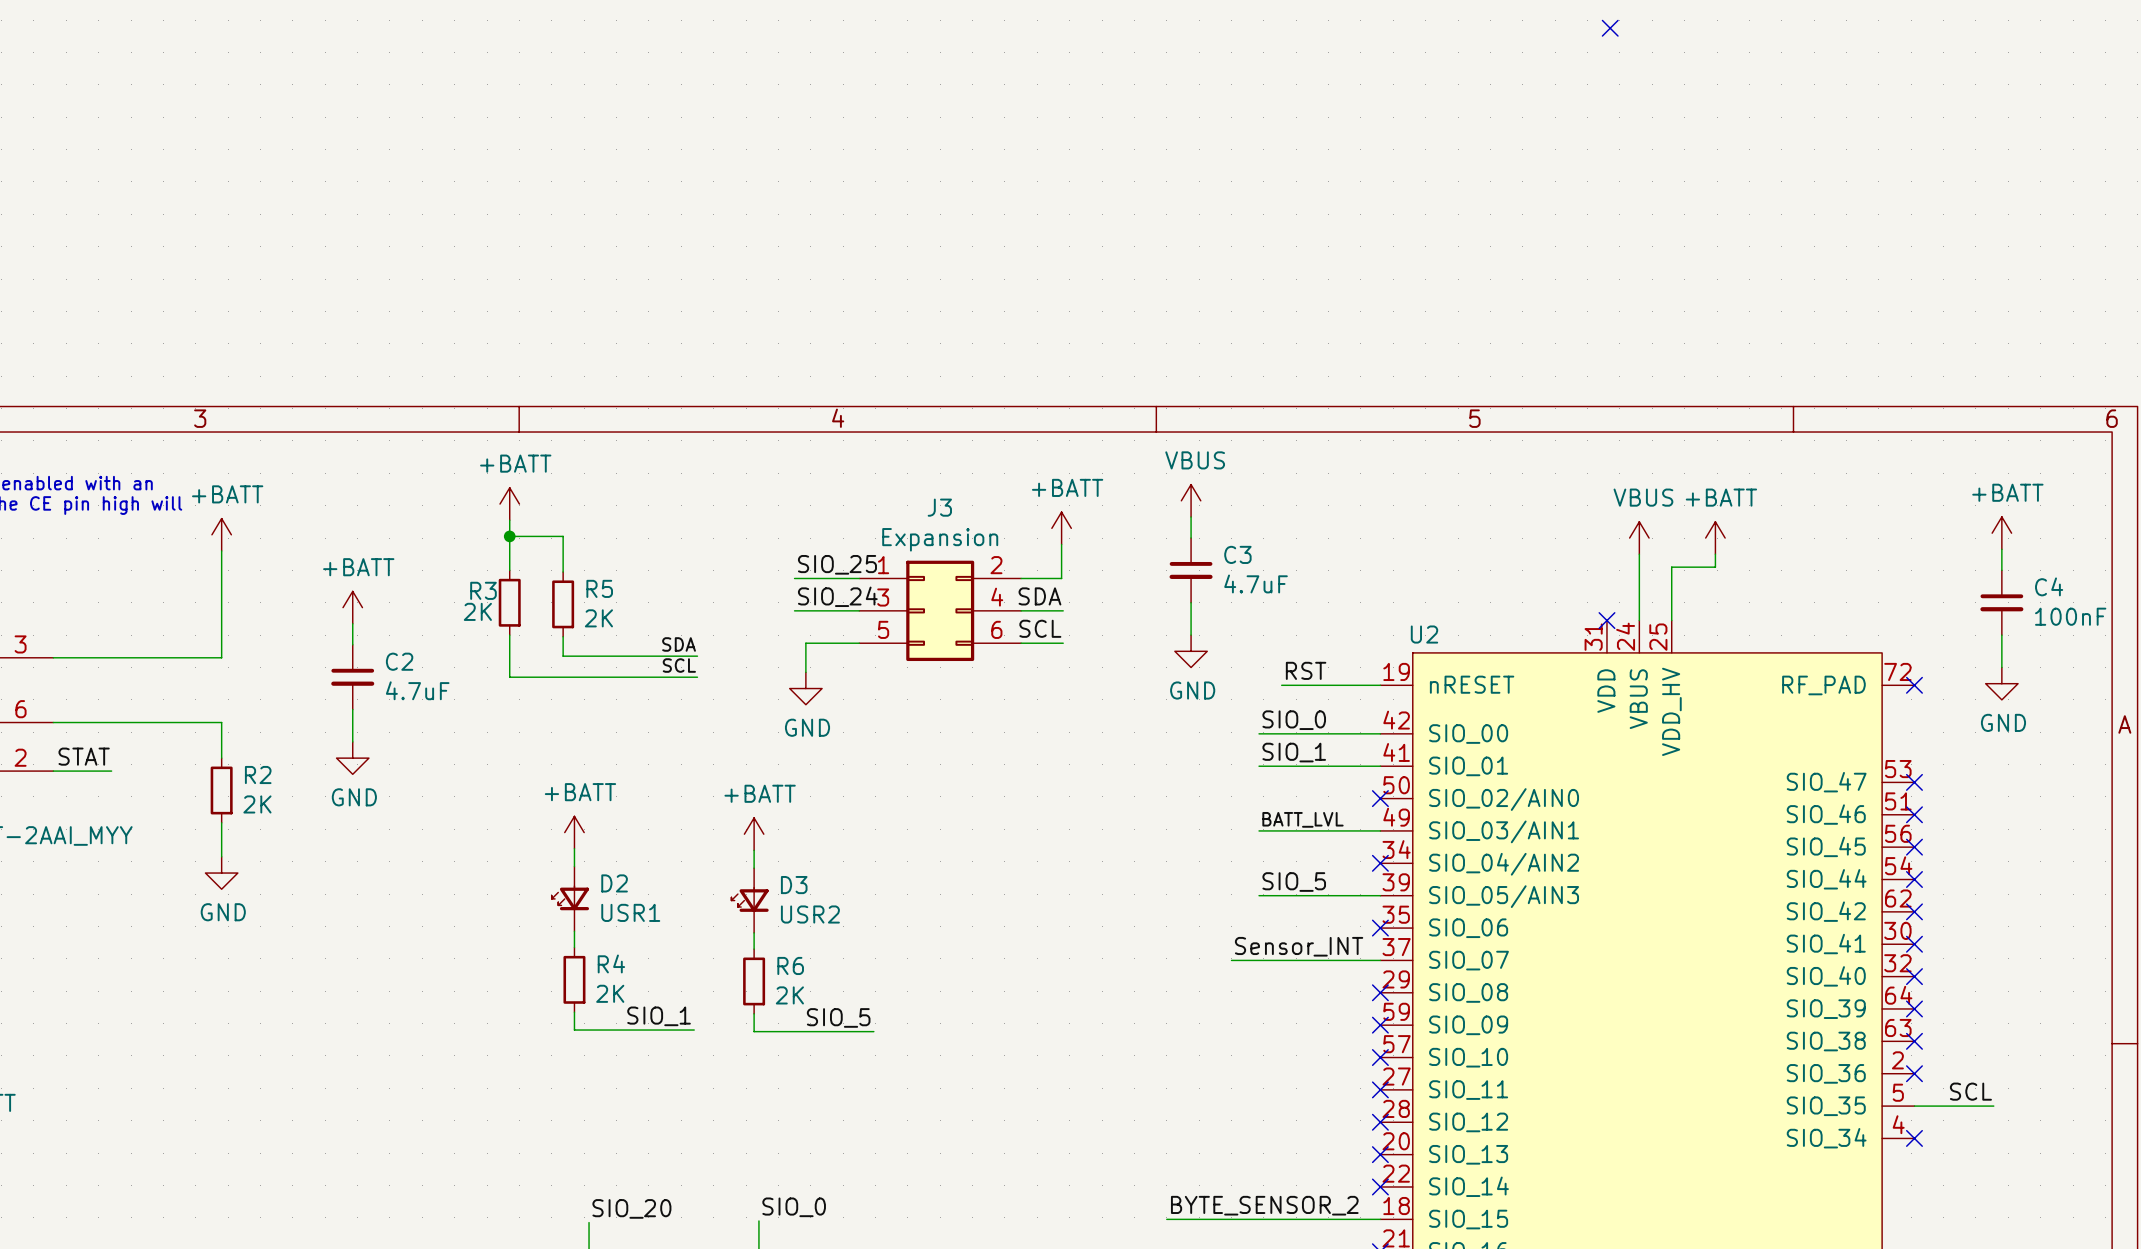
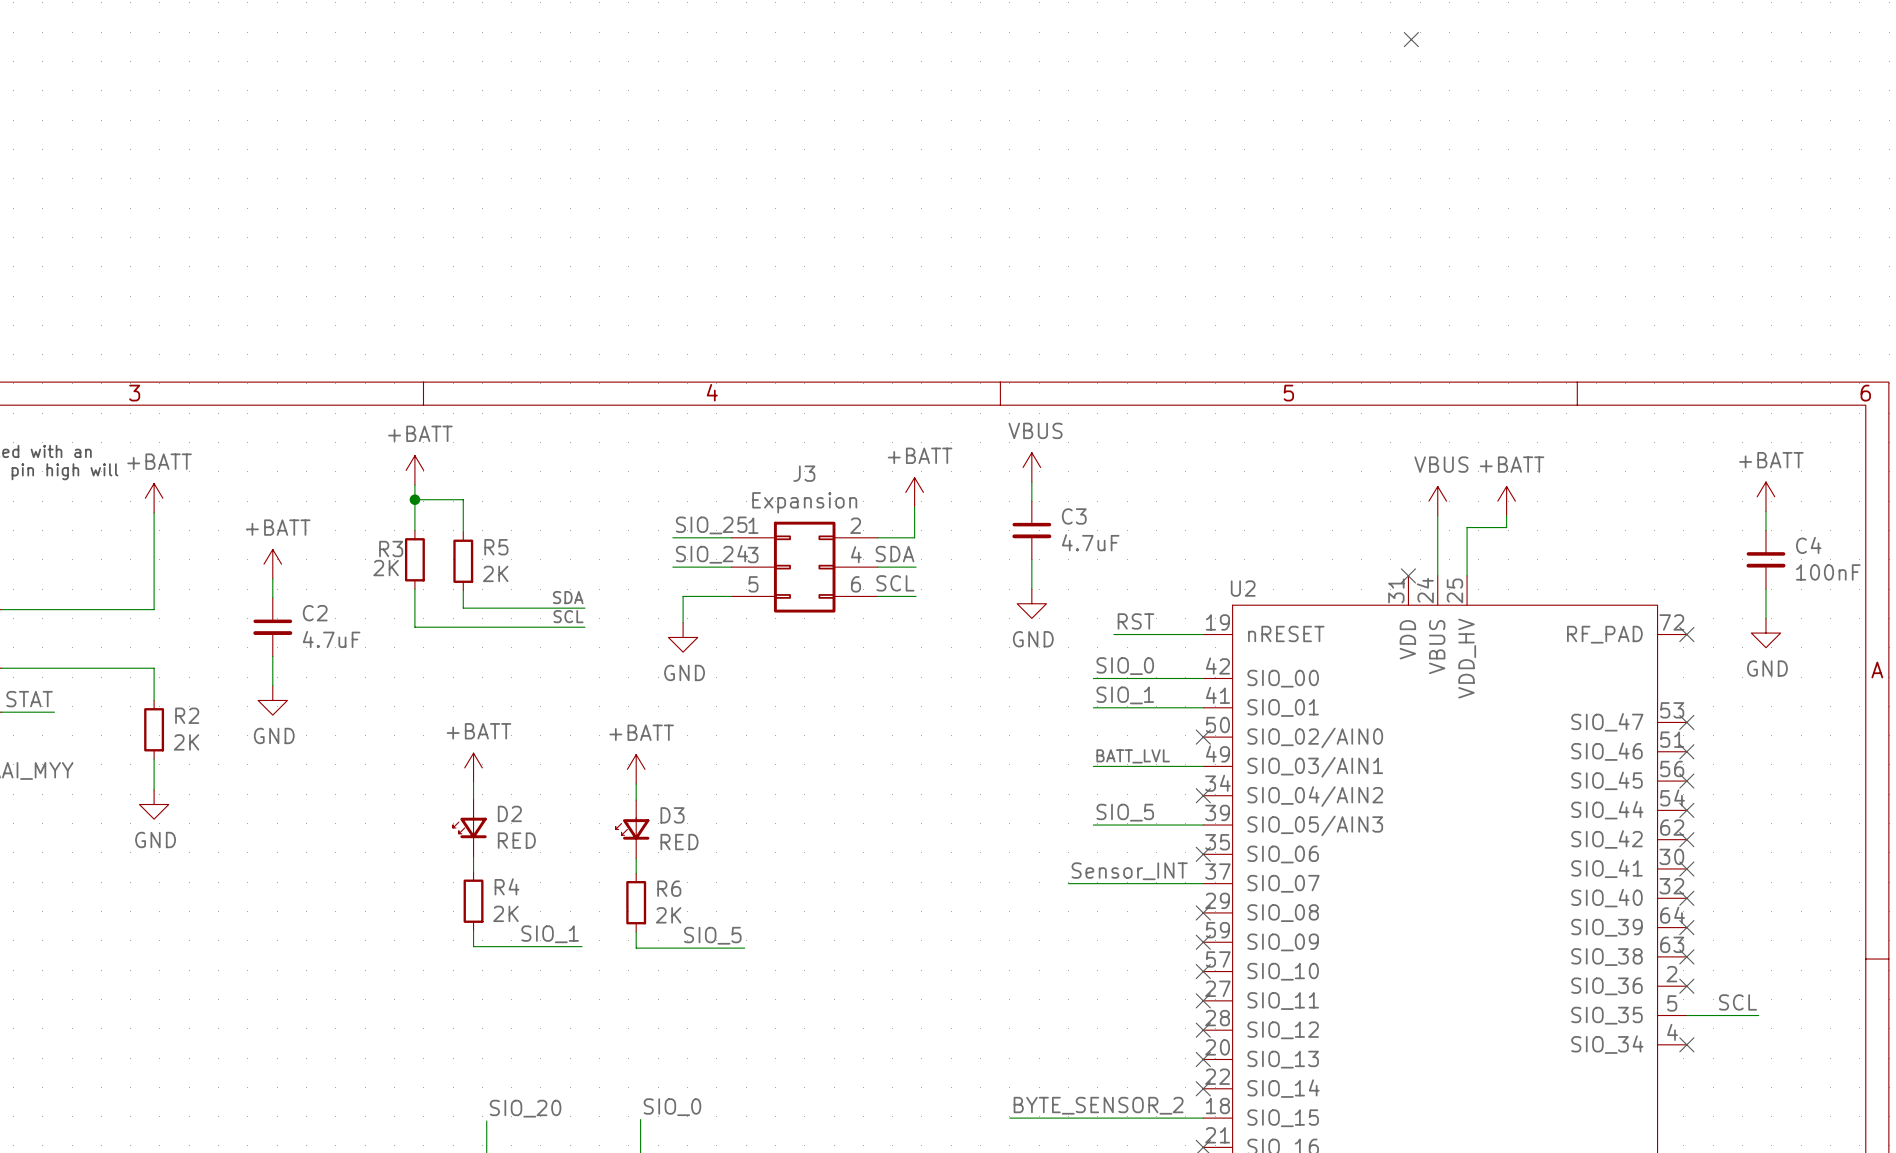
D2 value: USR1 (630, 912) -> RED (516, 840)
D3 value: USR2 (810, 914) -> RED (679, 842)

